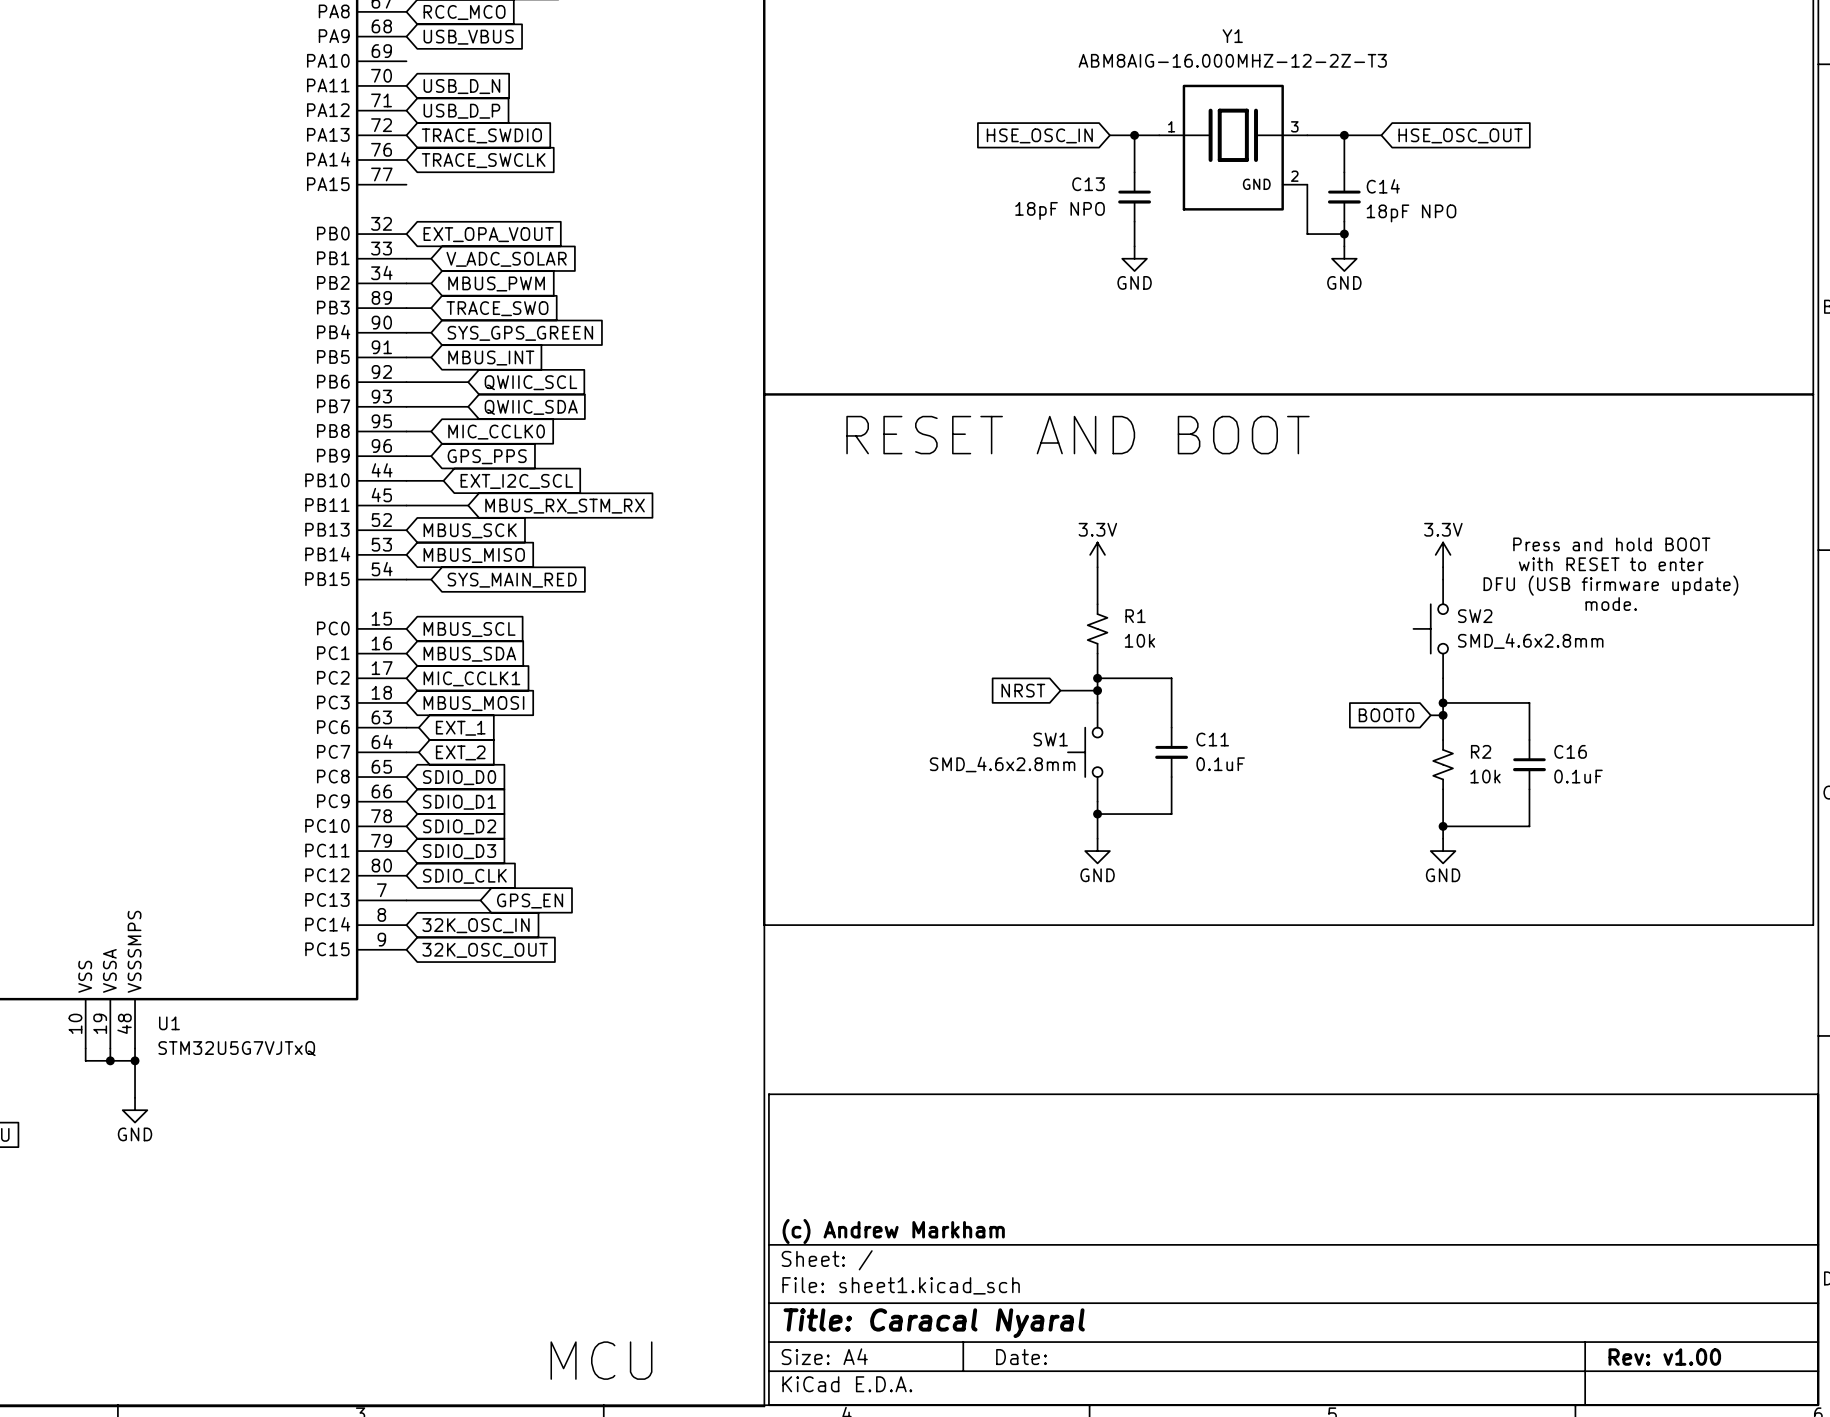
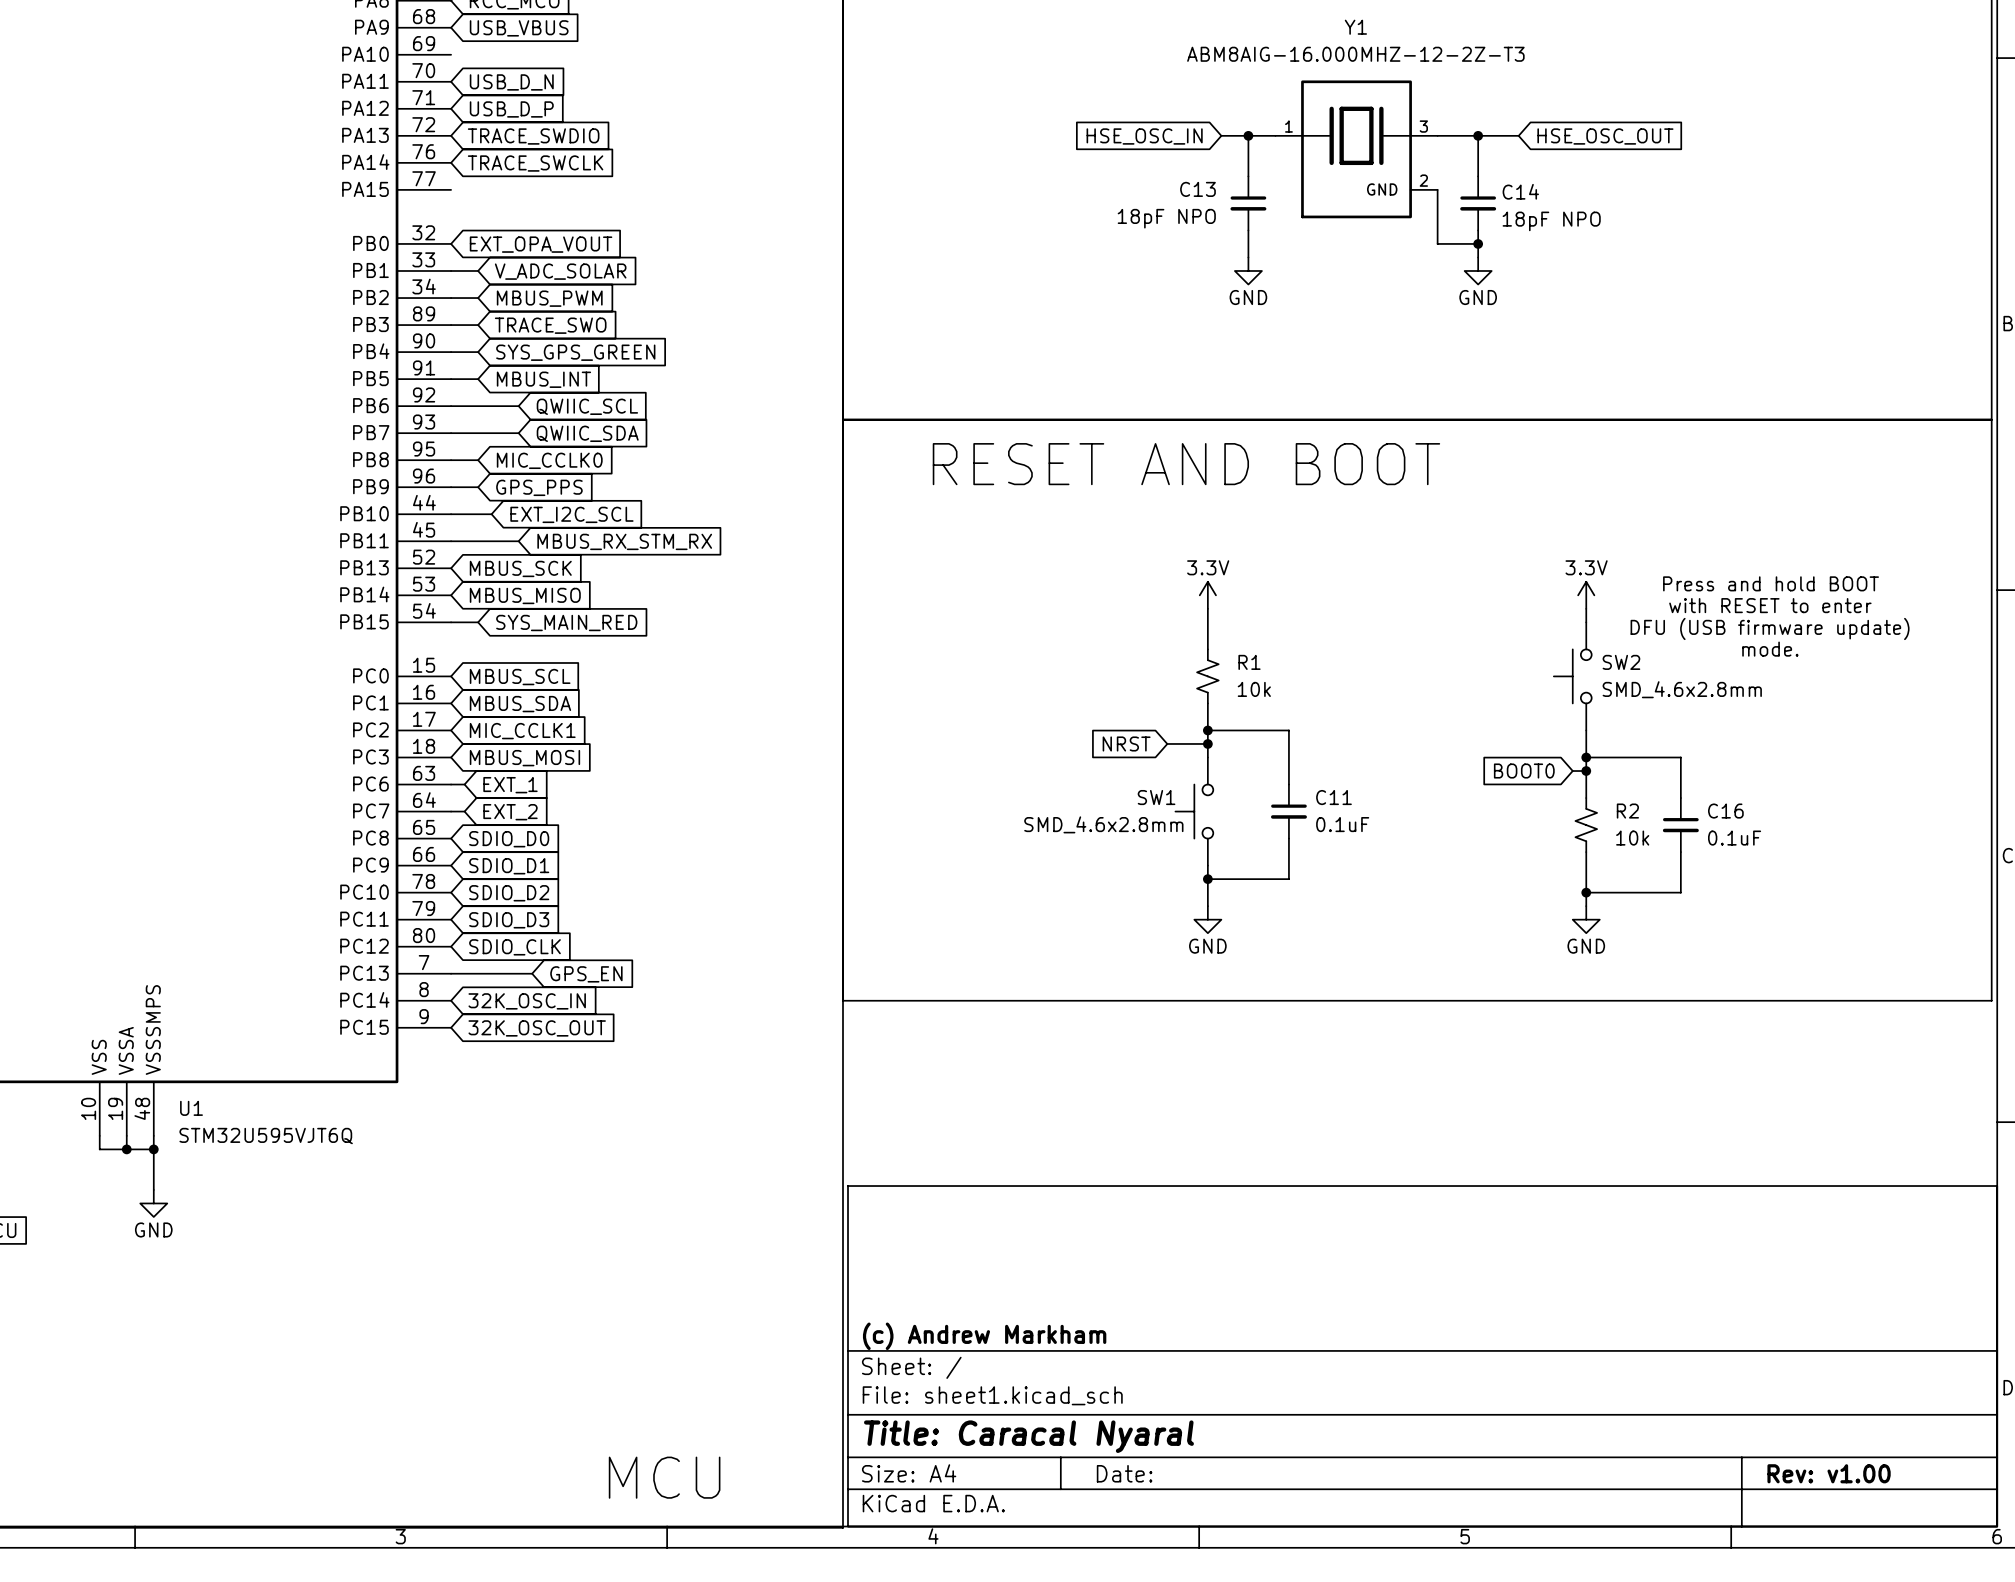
U1 value: STM32U5G7VJTxQ (237, 1048) -> STM32U595VJT6Q (266, 1136)

